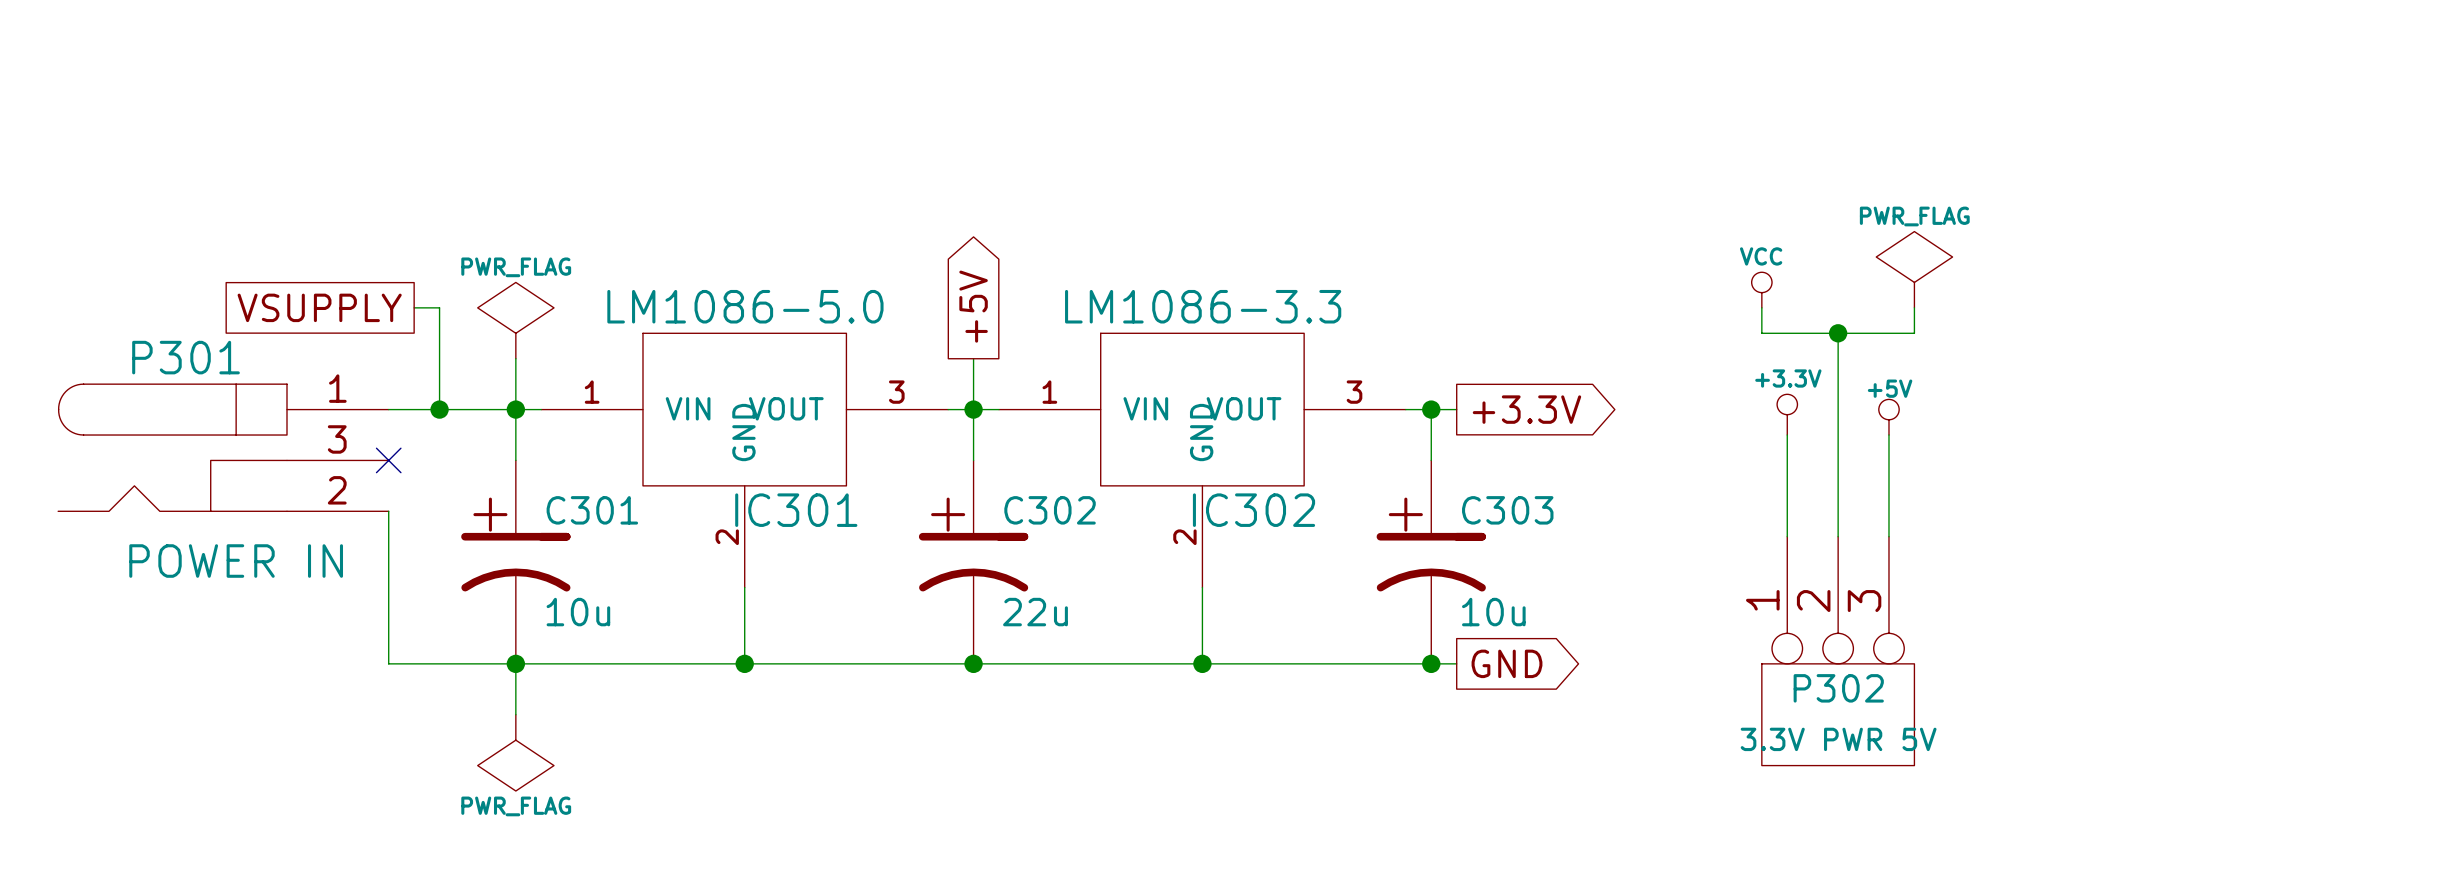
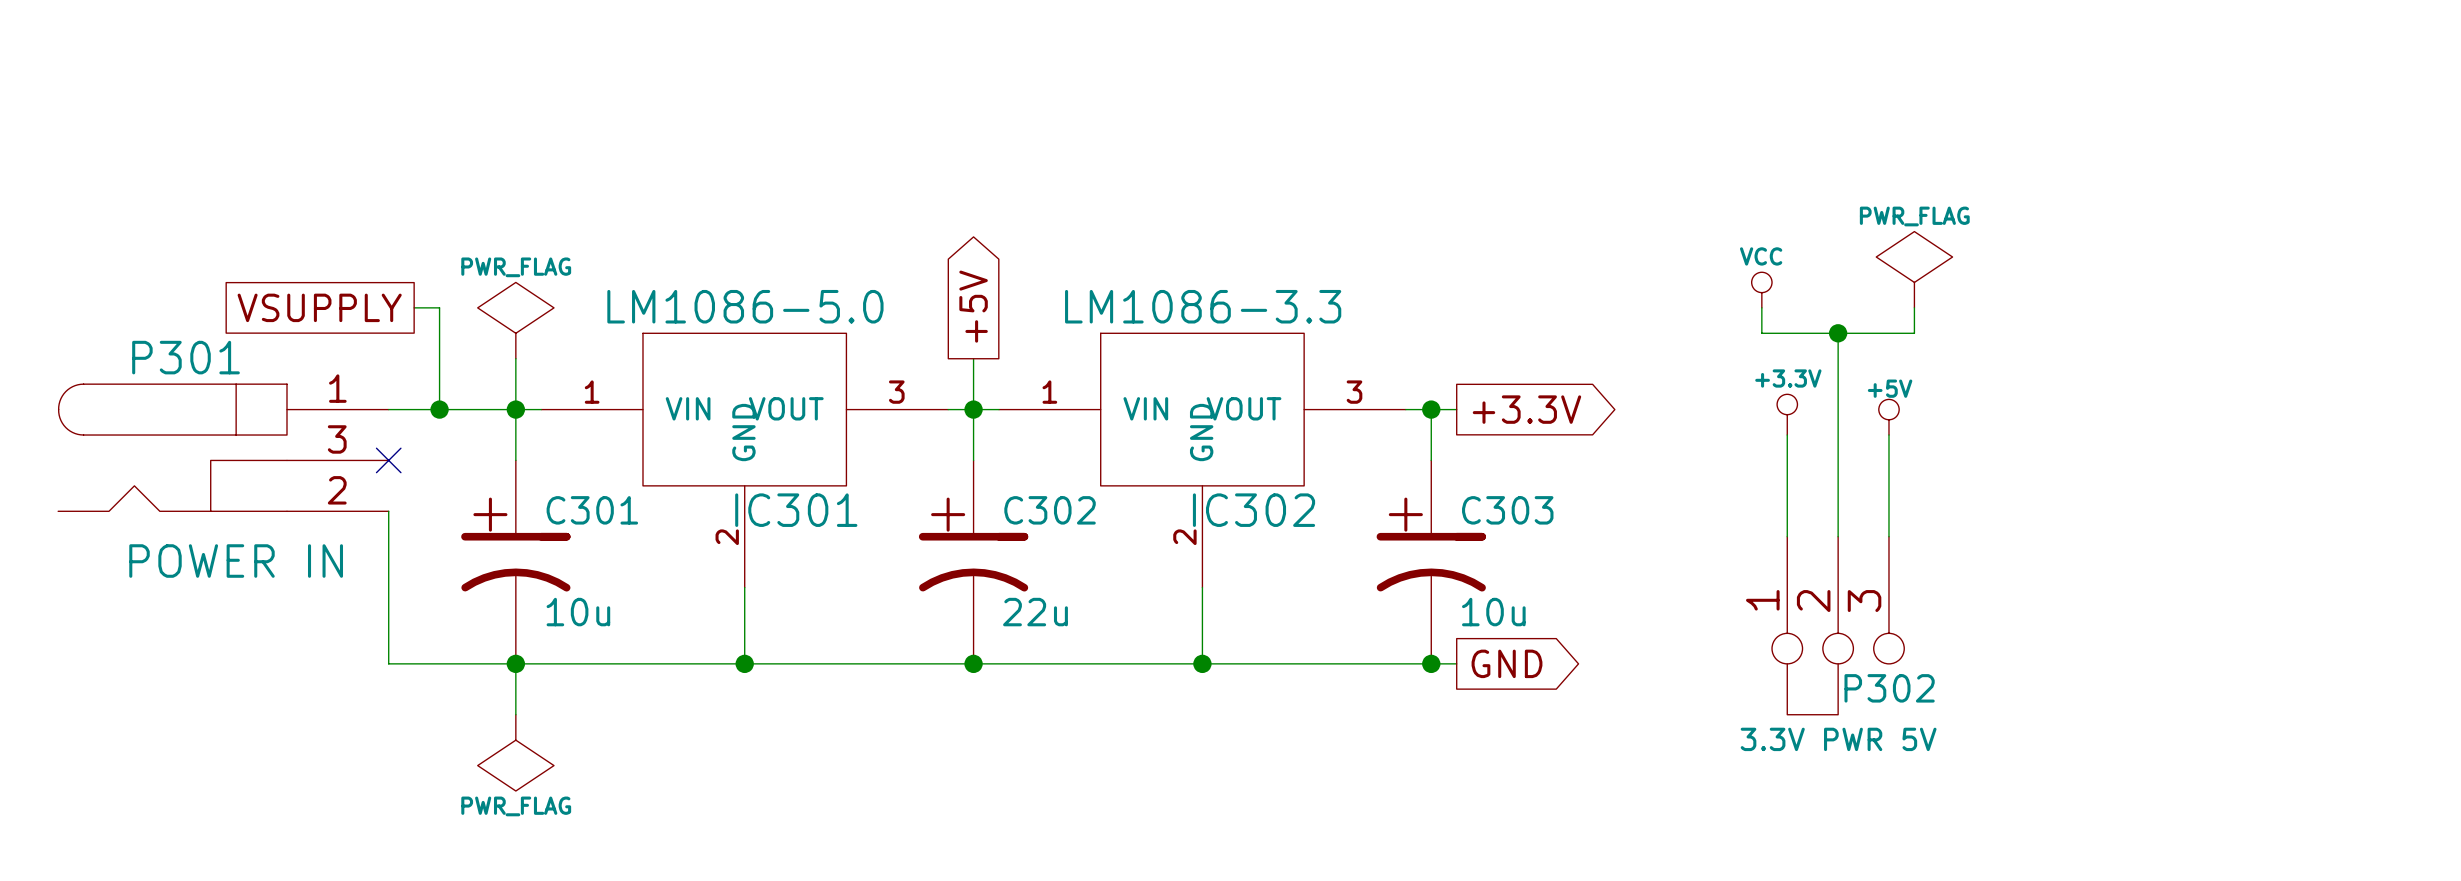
P302 symbol: [1761, 536, 1915, 766] -> [1772, 536, 1905, 715]
P302 name position: P302 (1838, 688) -> P302 (1889, 688)

